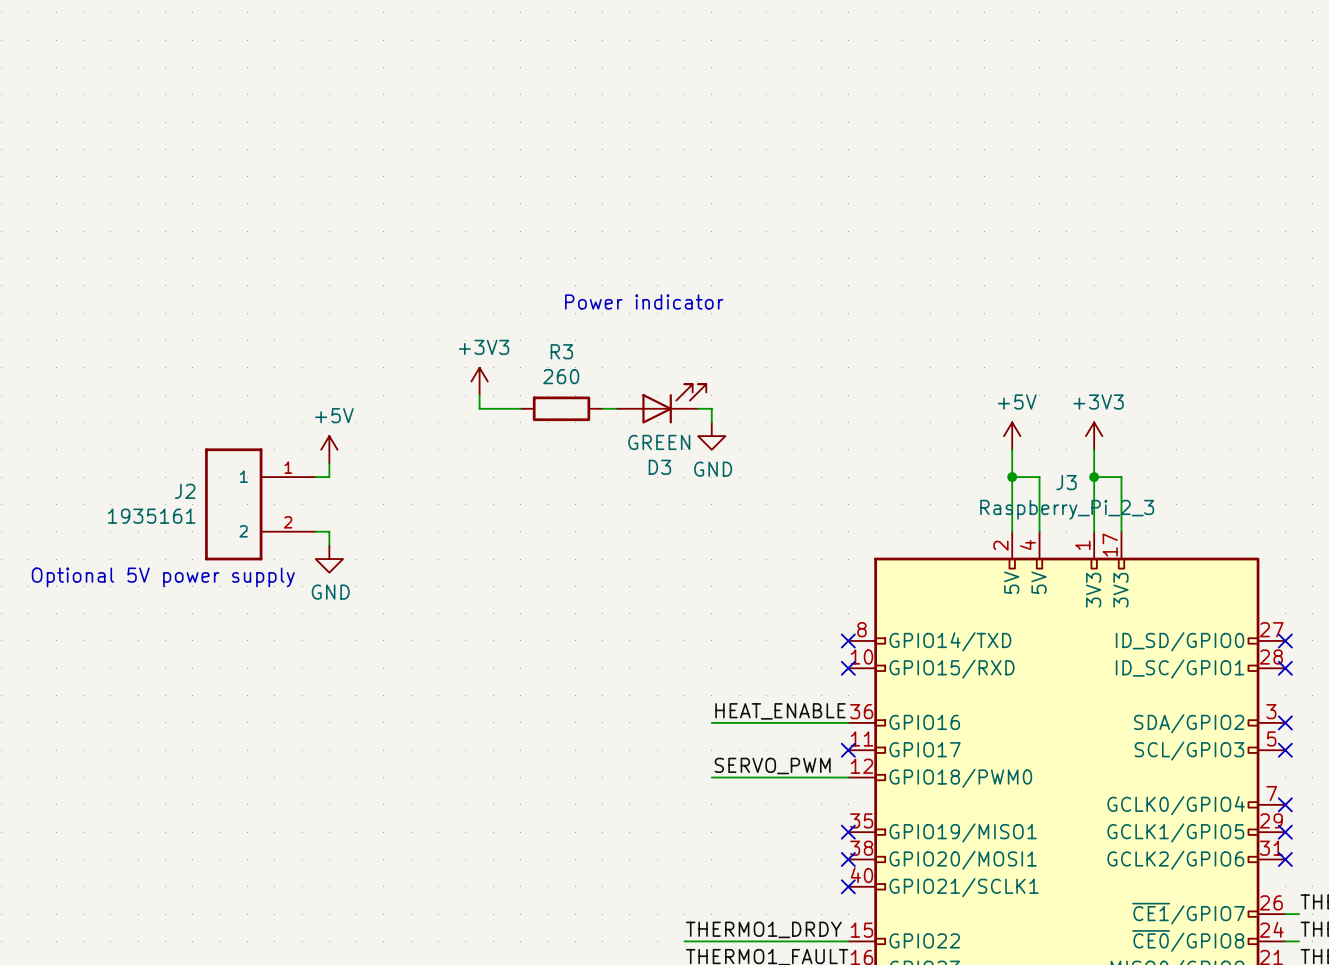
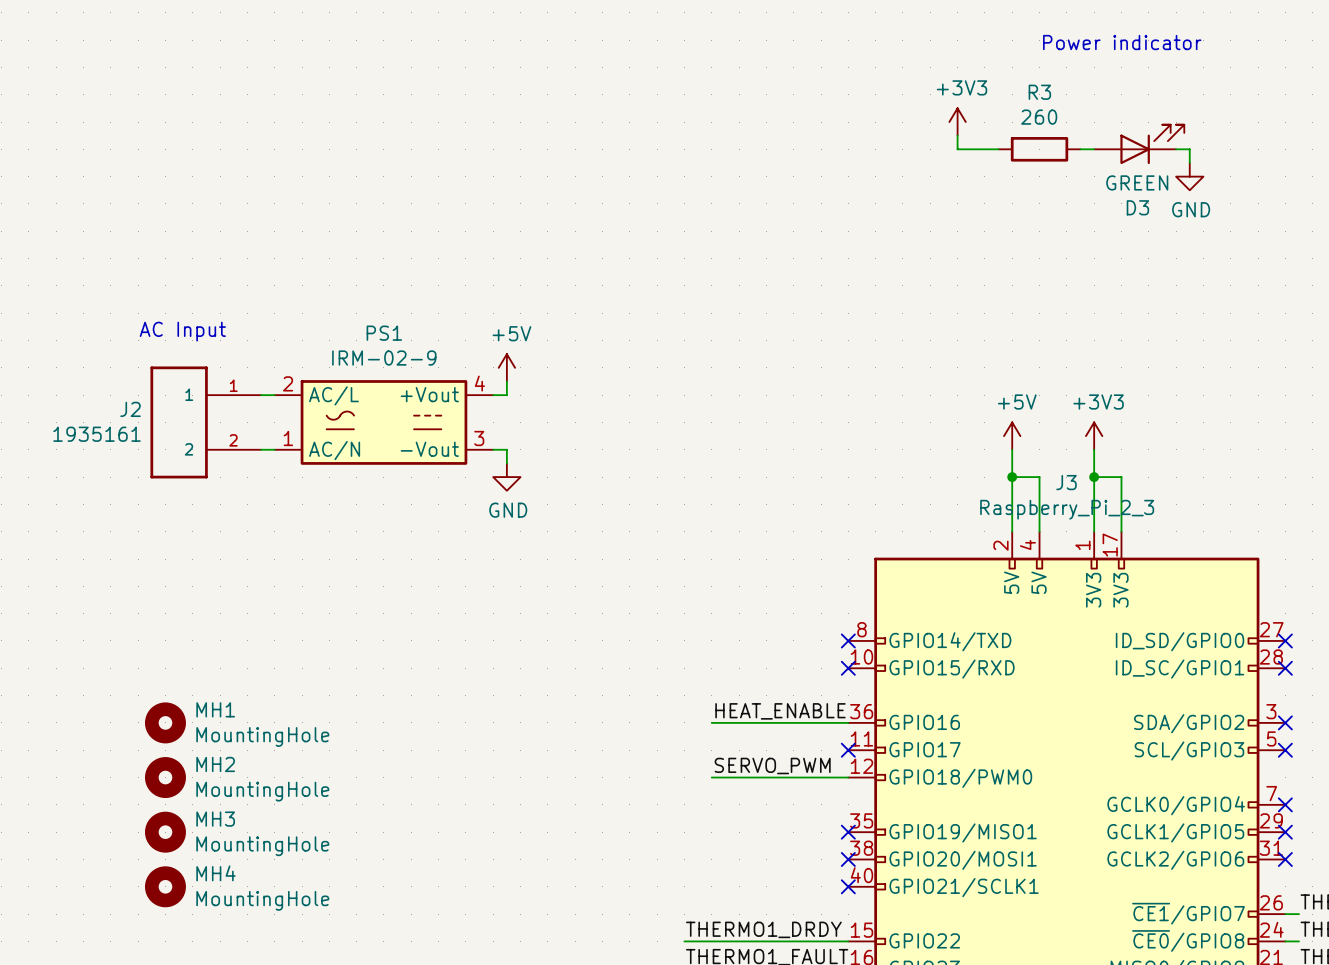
text: none -> Power indicator (1122, 42)
power symbol: none -> +3V3 (957, 122)
wire: none -> (957, 135) (957, 149) (998, 149)
wire: none -> (1080, 149) (1094, 149)
wire: none -> (1176, 149) (1189, 149) (1189, 162)
power symbol: none -> GND (1189, 176)
text: Power indicator (644, 302) -> none
text: none -> AC Input (182, 331)
power symbol: +3V3 (479, 381) -> none
wire: none -> (261, 395) (274, 395)
wire: (479, 395) (479, 408) (520, 408) -> none
D3 position: (661, 403) -> (1139, 144)
R3 position: (561, 408) -> (1039, 149)
wire: (602, 408) (616, 408) -> none
wire: (698, 408) (711, 408) (711, 422) -> none
PS1: none -> IRM-02-9 (383, 422)
power symbol: GND (711, 436) -> none
wire: none -> (261, 449) (274, 449)
power symbol position: +5V (329, 449) -> +5V (506, 367)
wire: (329, 463) (329, 477) (315, 477) -> (506, 381) (506, 395) (493, 395)
power symbol: none -> GND (506, 477)
J2 position: (260, 504) -> (205, 422)
wire: (315, 531) (329, 531) (329, 545) -> (493, 449) (506, 449) (506, 463)
power symbol: GND (329, 559) -> none
text: Optional 5V power supply (163, 577) -> none
MH1: none -> MountingHole (165, 722)
MH2: none -> MountingHole (165, 777)
MH3: none -> MountingHole (165, 832)
MH4: none -> MountingHole (165, 886)

